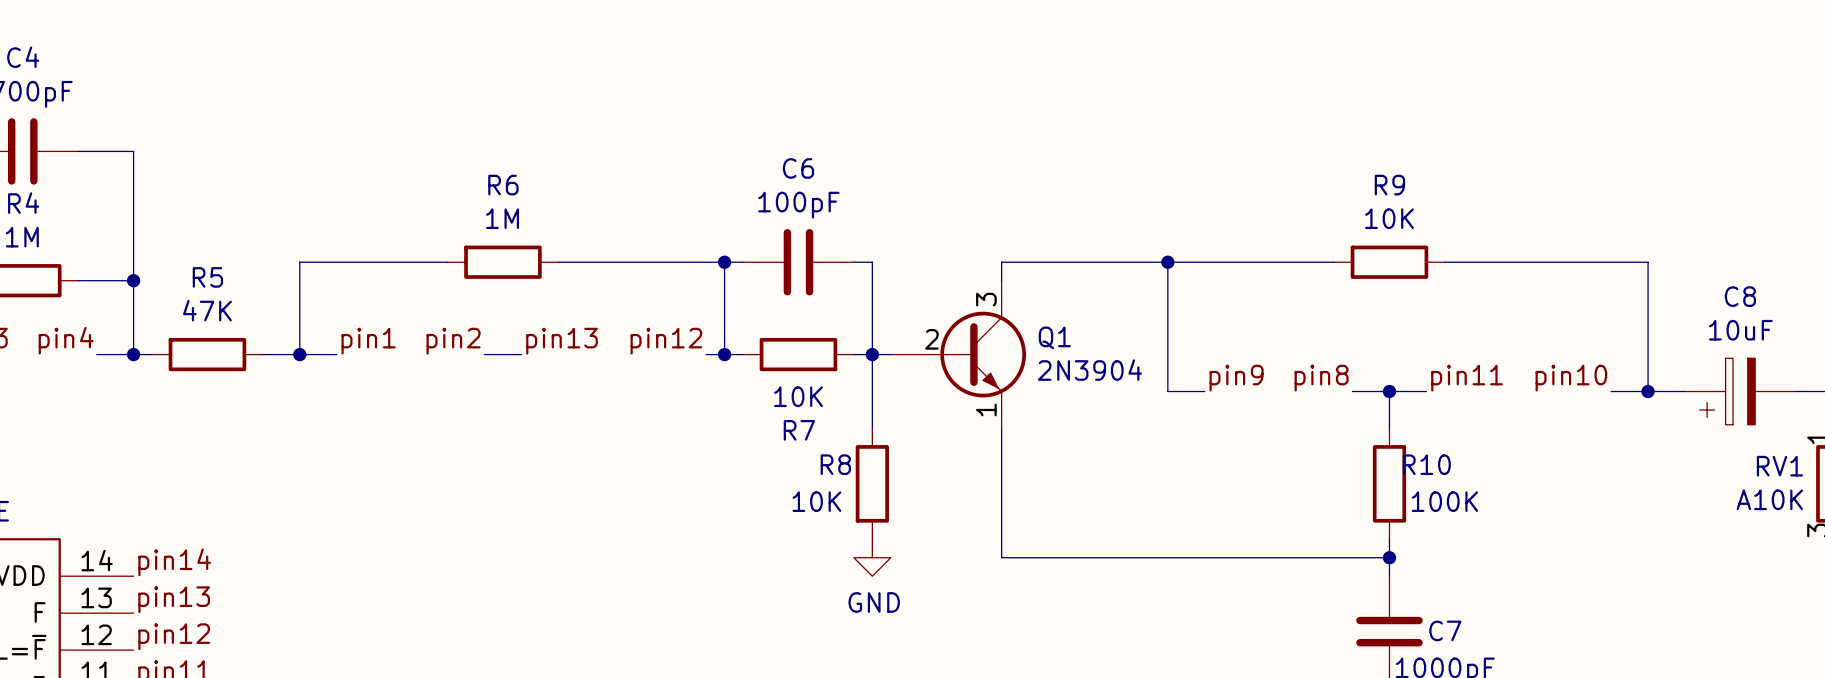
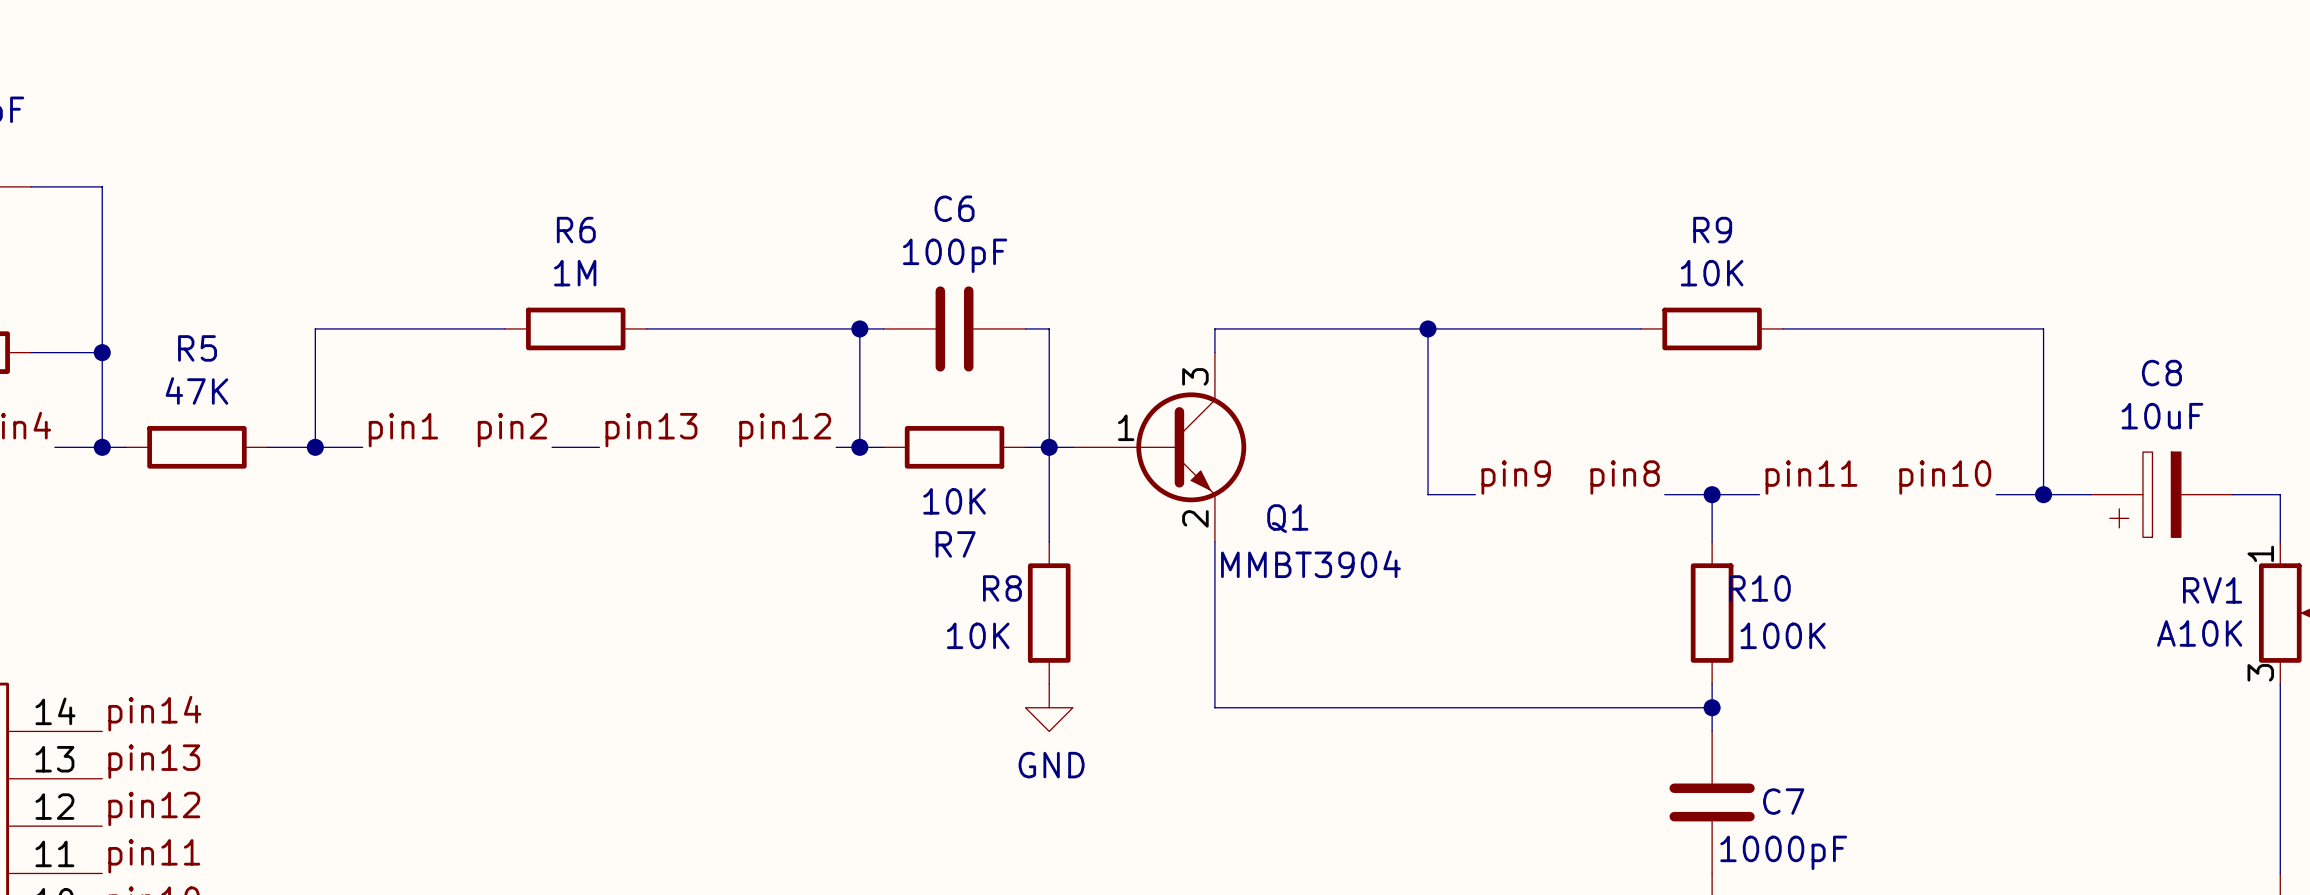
Q1 name position: Q1 (1054, 337) -> Q1 (1287, 518)
Q1 pin number: 2 (931, 339) -> 1 (1126, 427)
Q1 value: 2N3904 (1089, 370) -> MMBT3904 (1310, 564)
Q1 pin number: 1 (986, 409) -> 2 (1195, 518)

